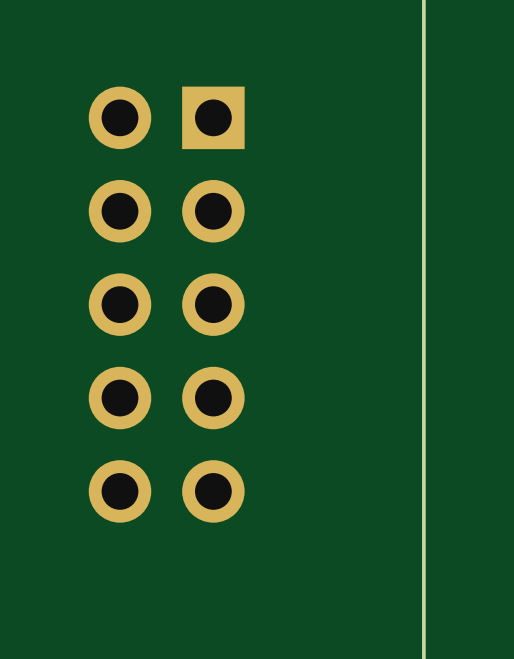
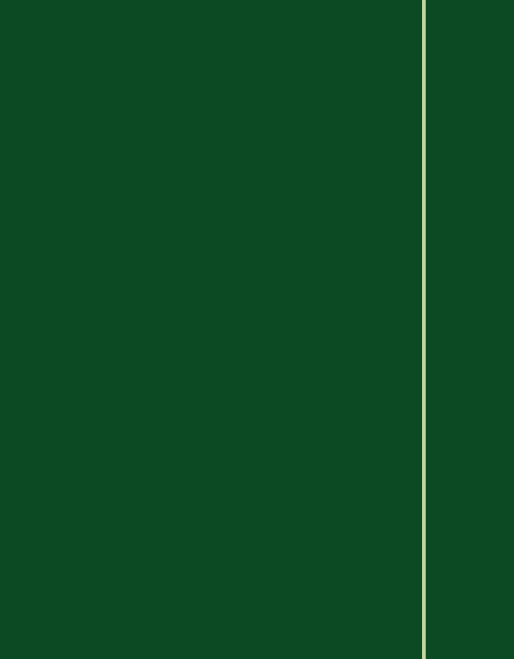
part: (166, 304) -> none

